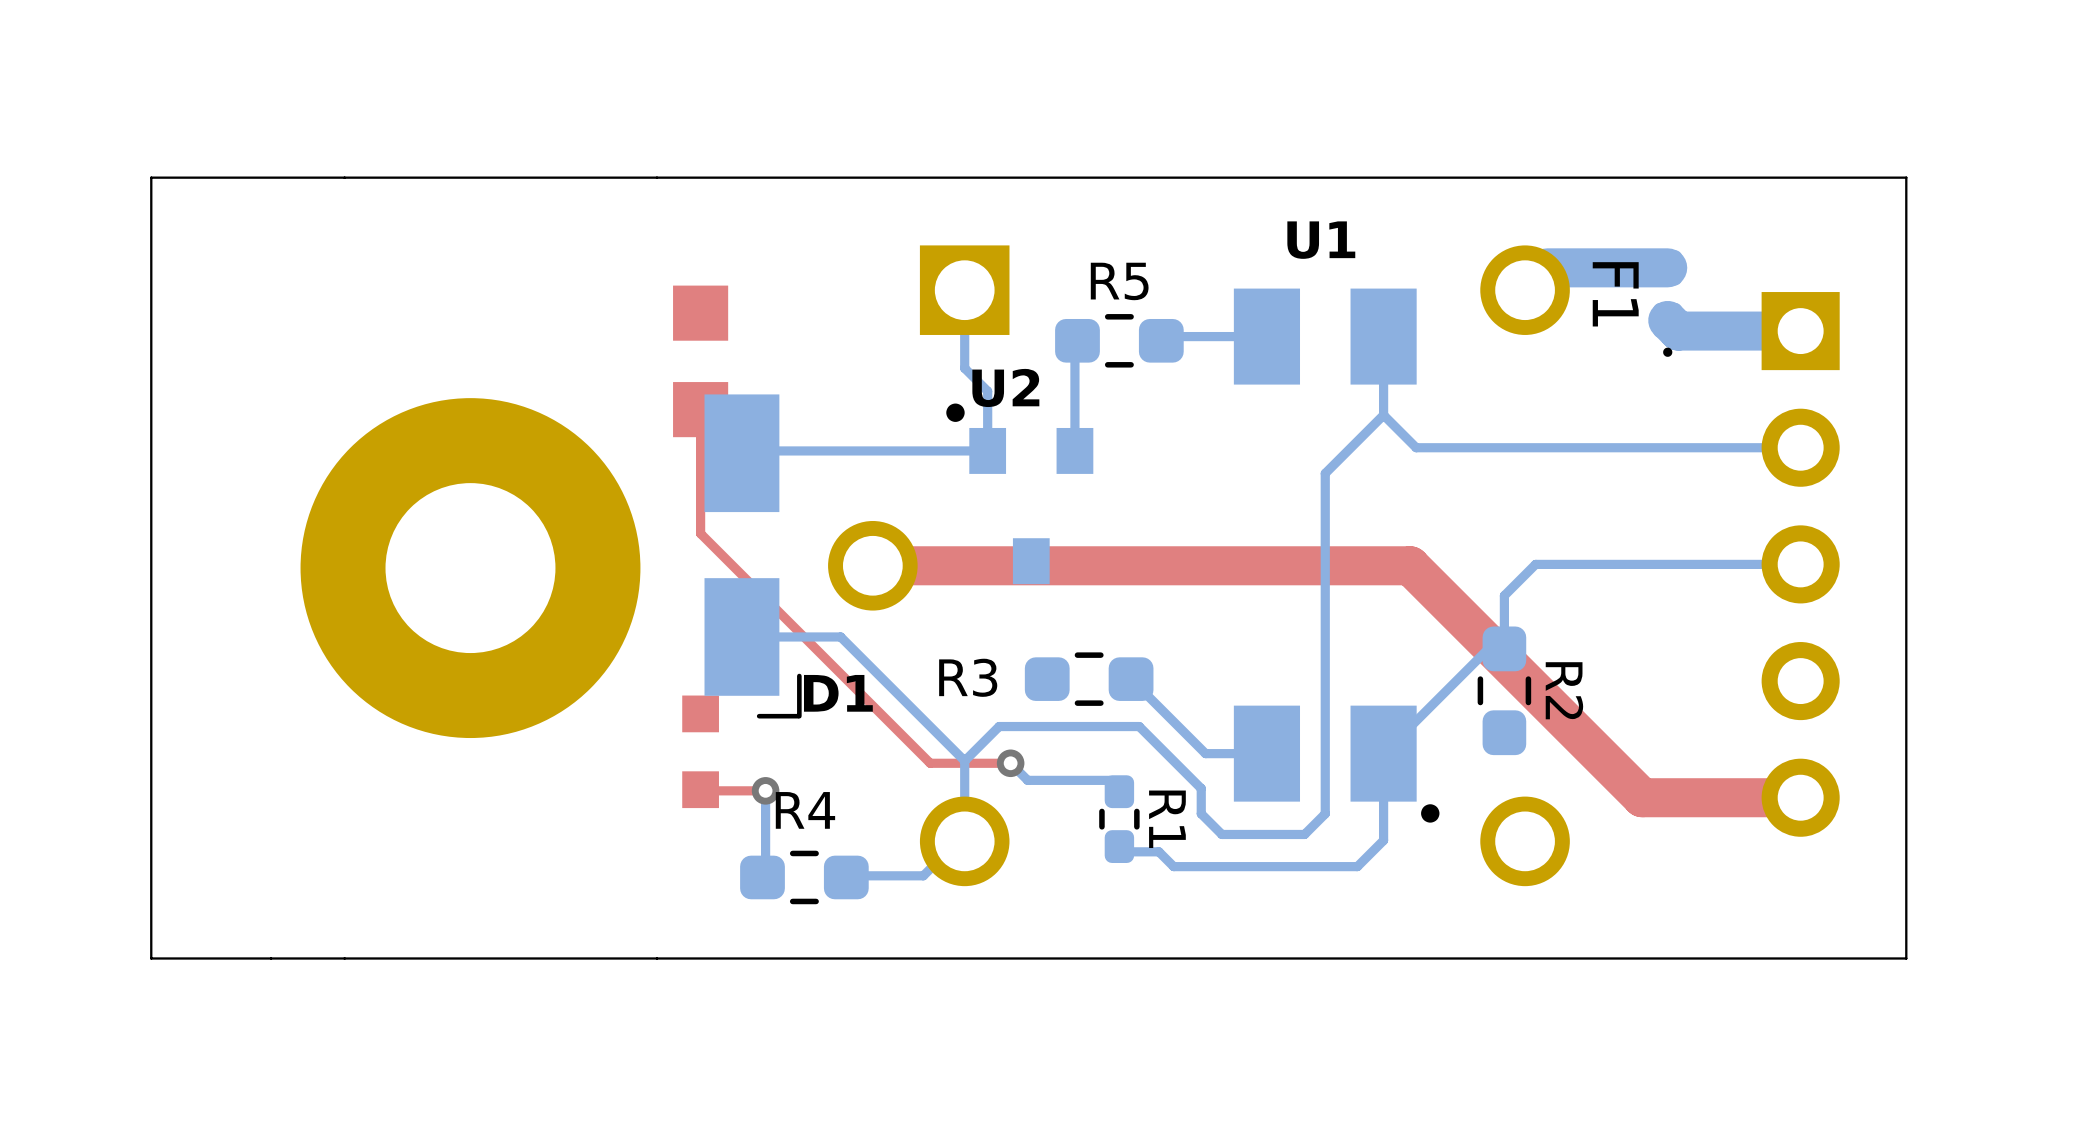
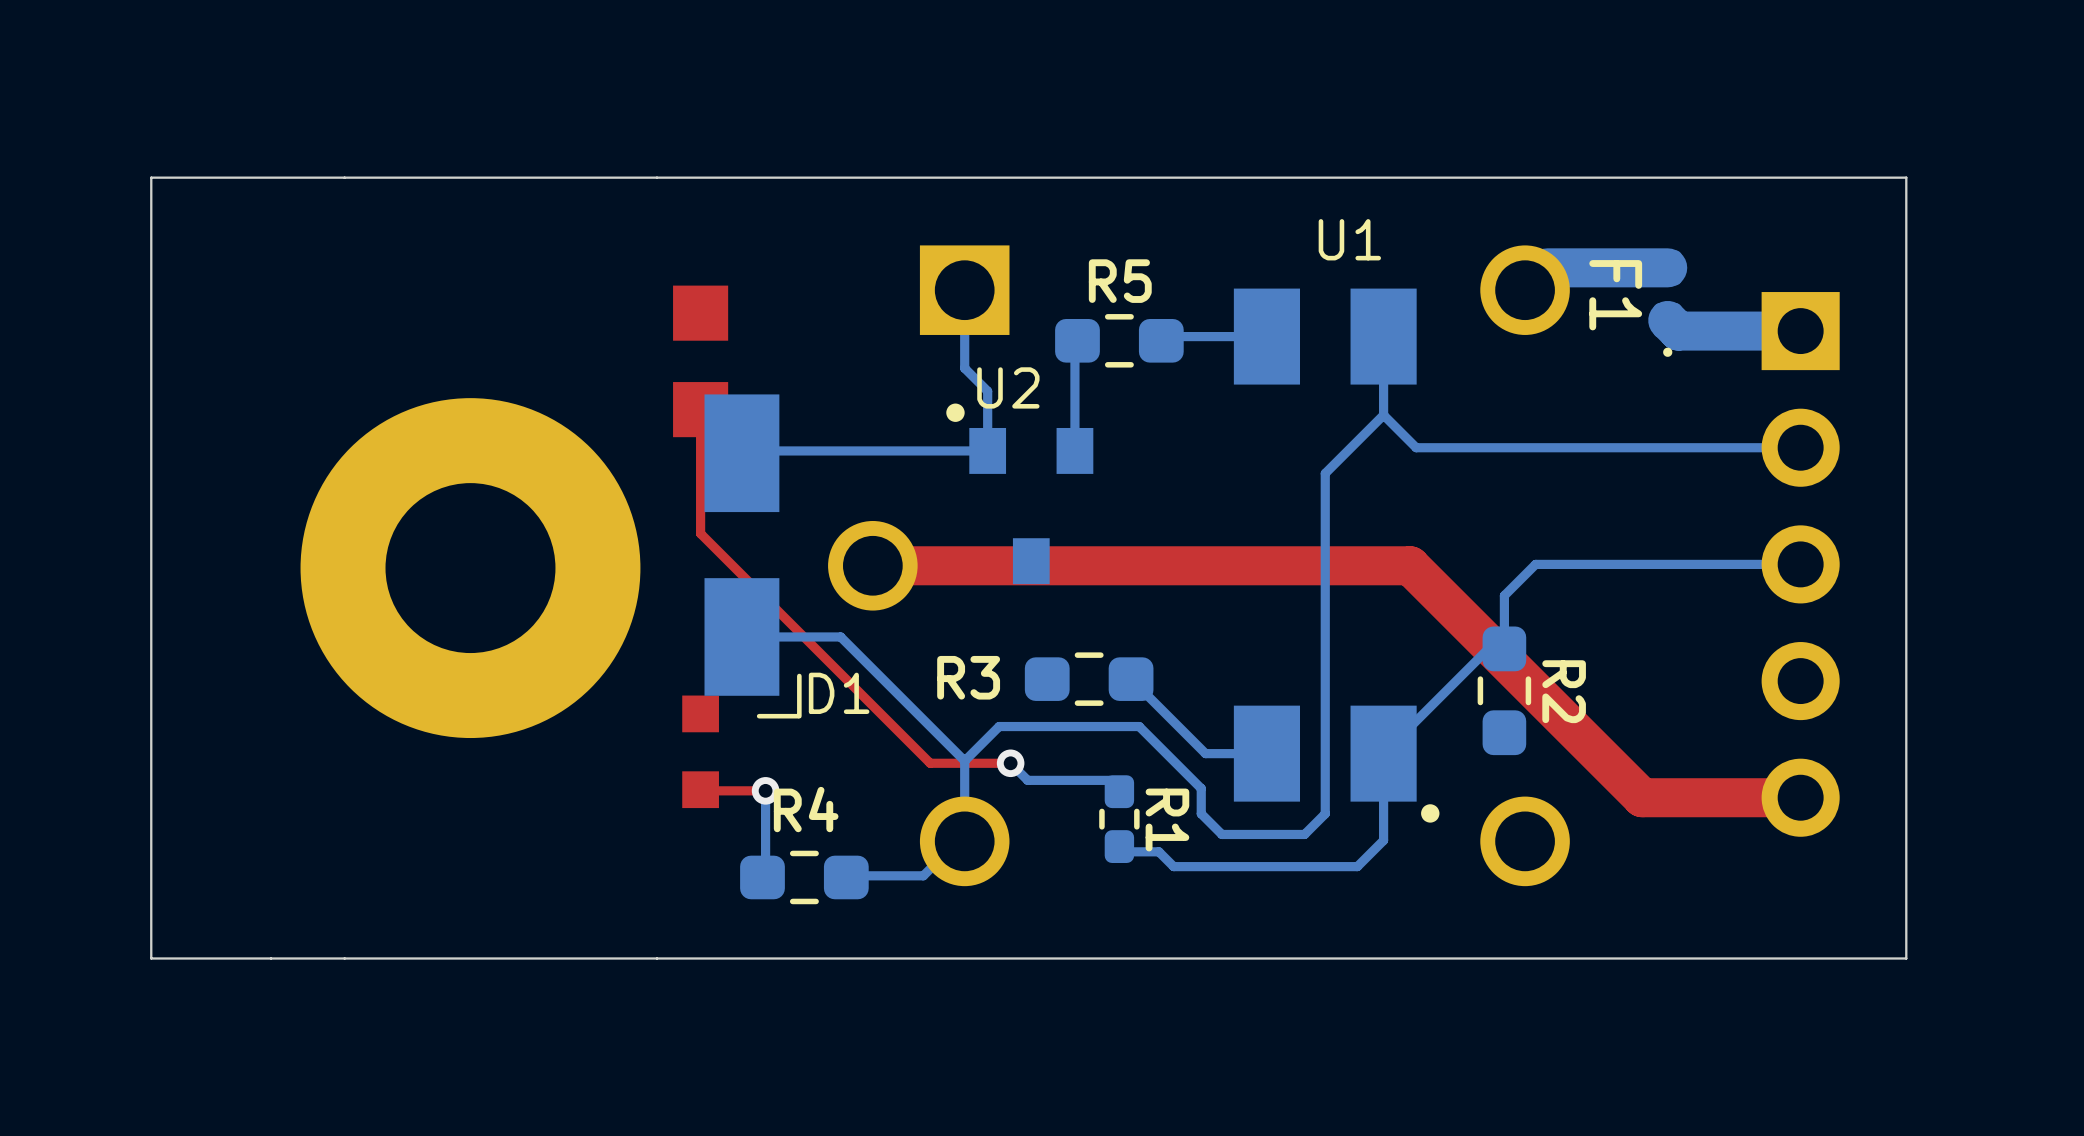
text position: U1 (1321, 240) -> U1 (1349, 239)

